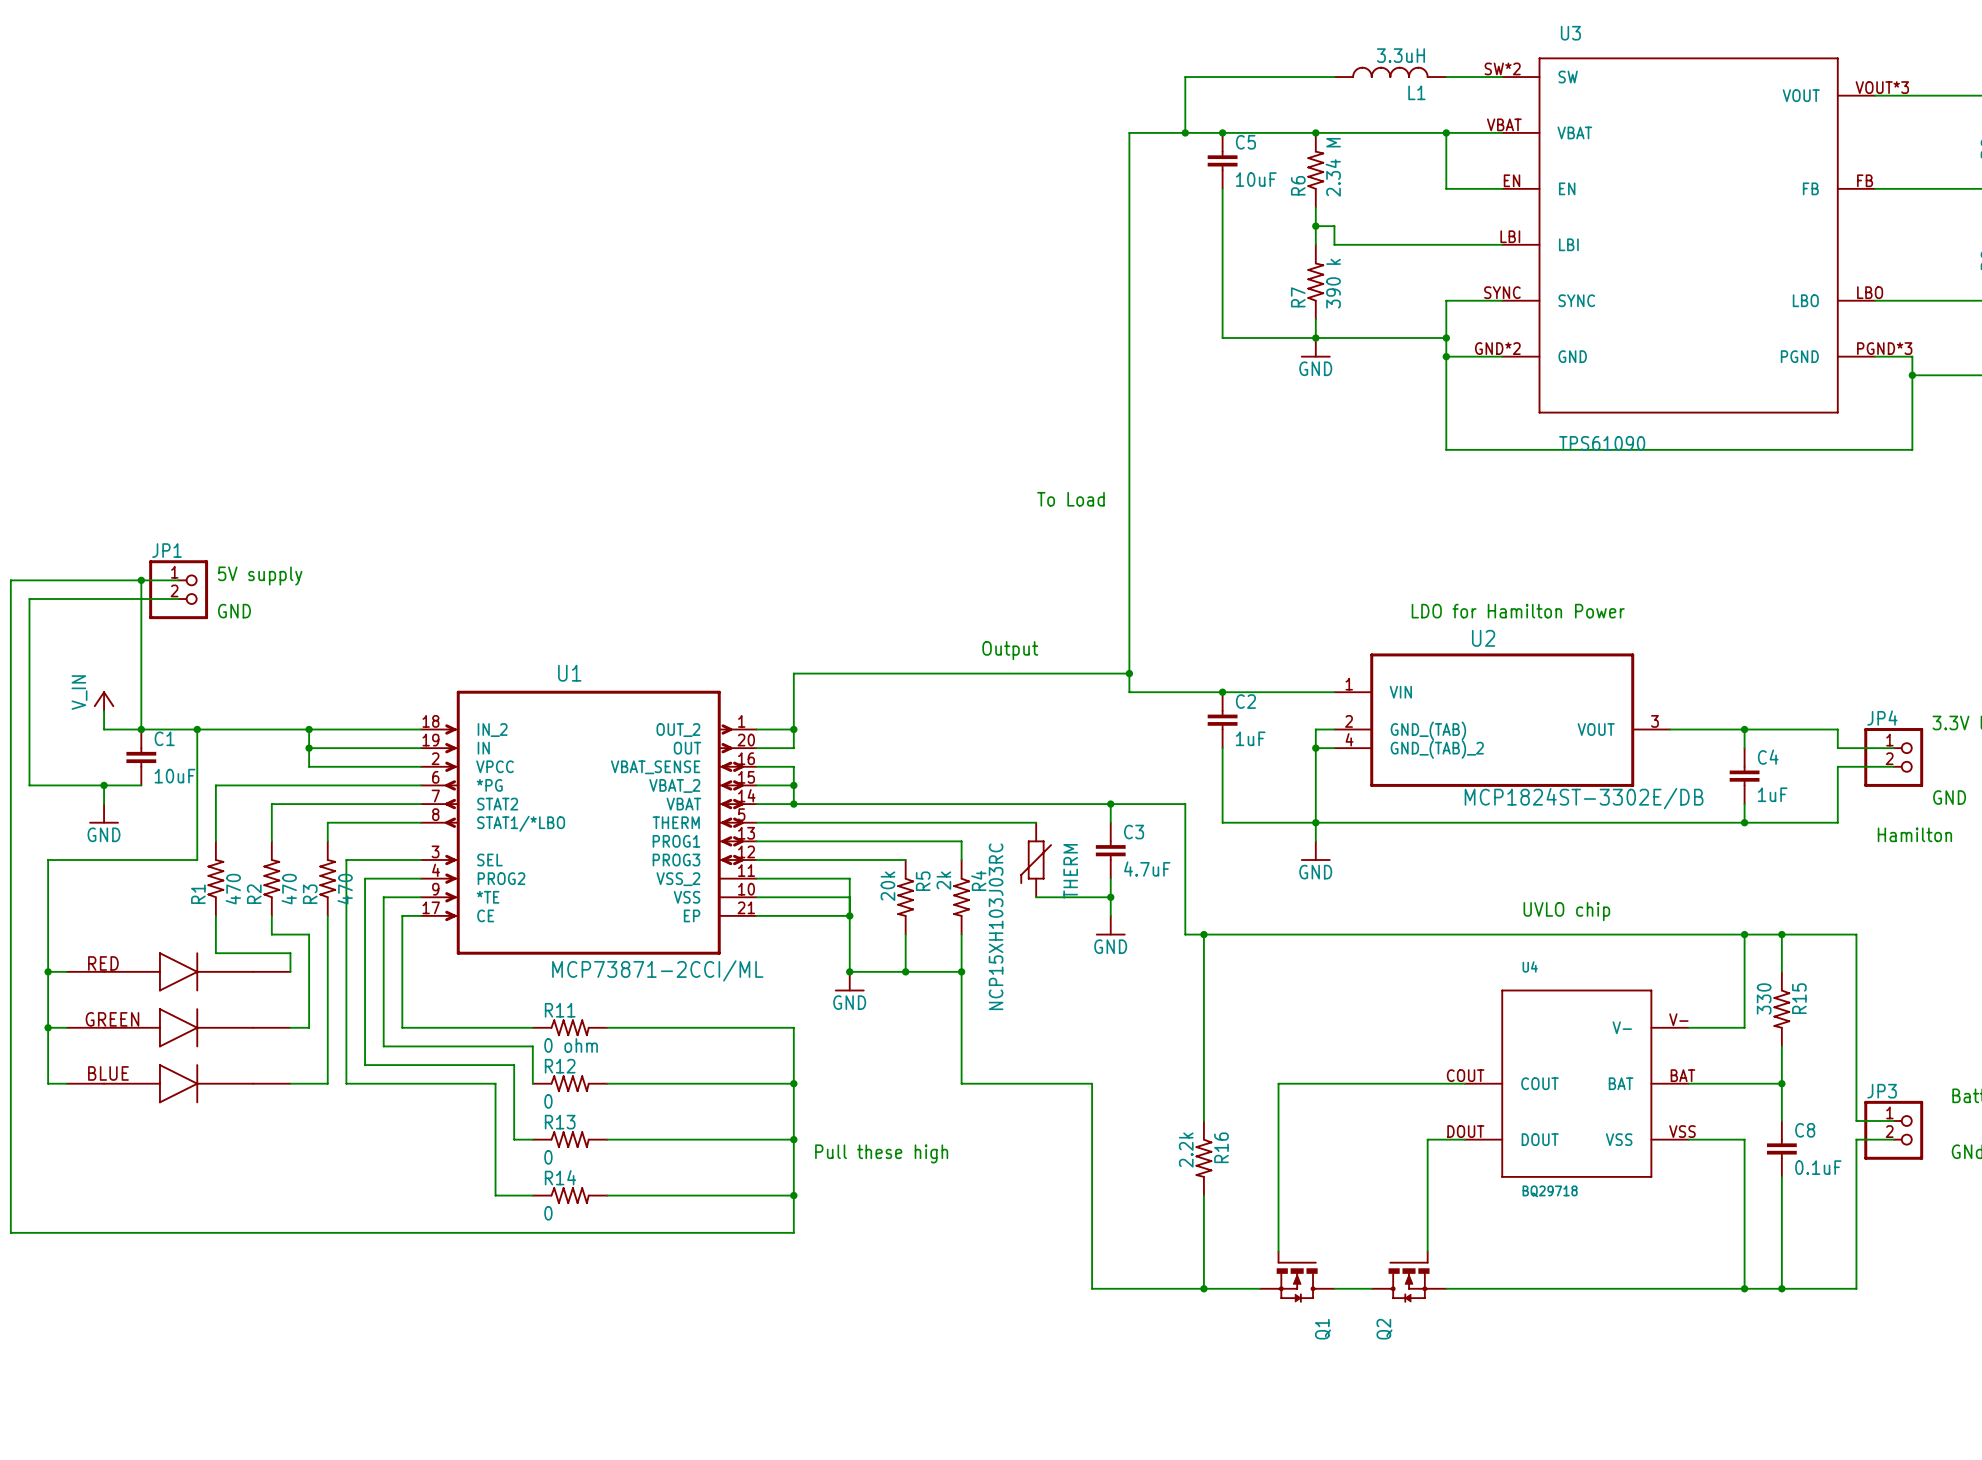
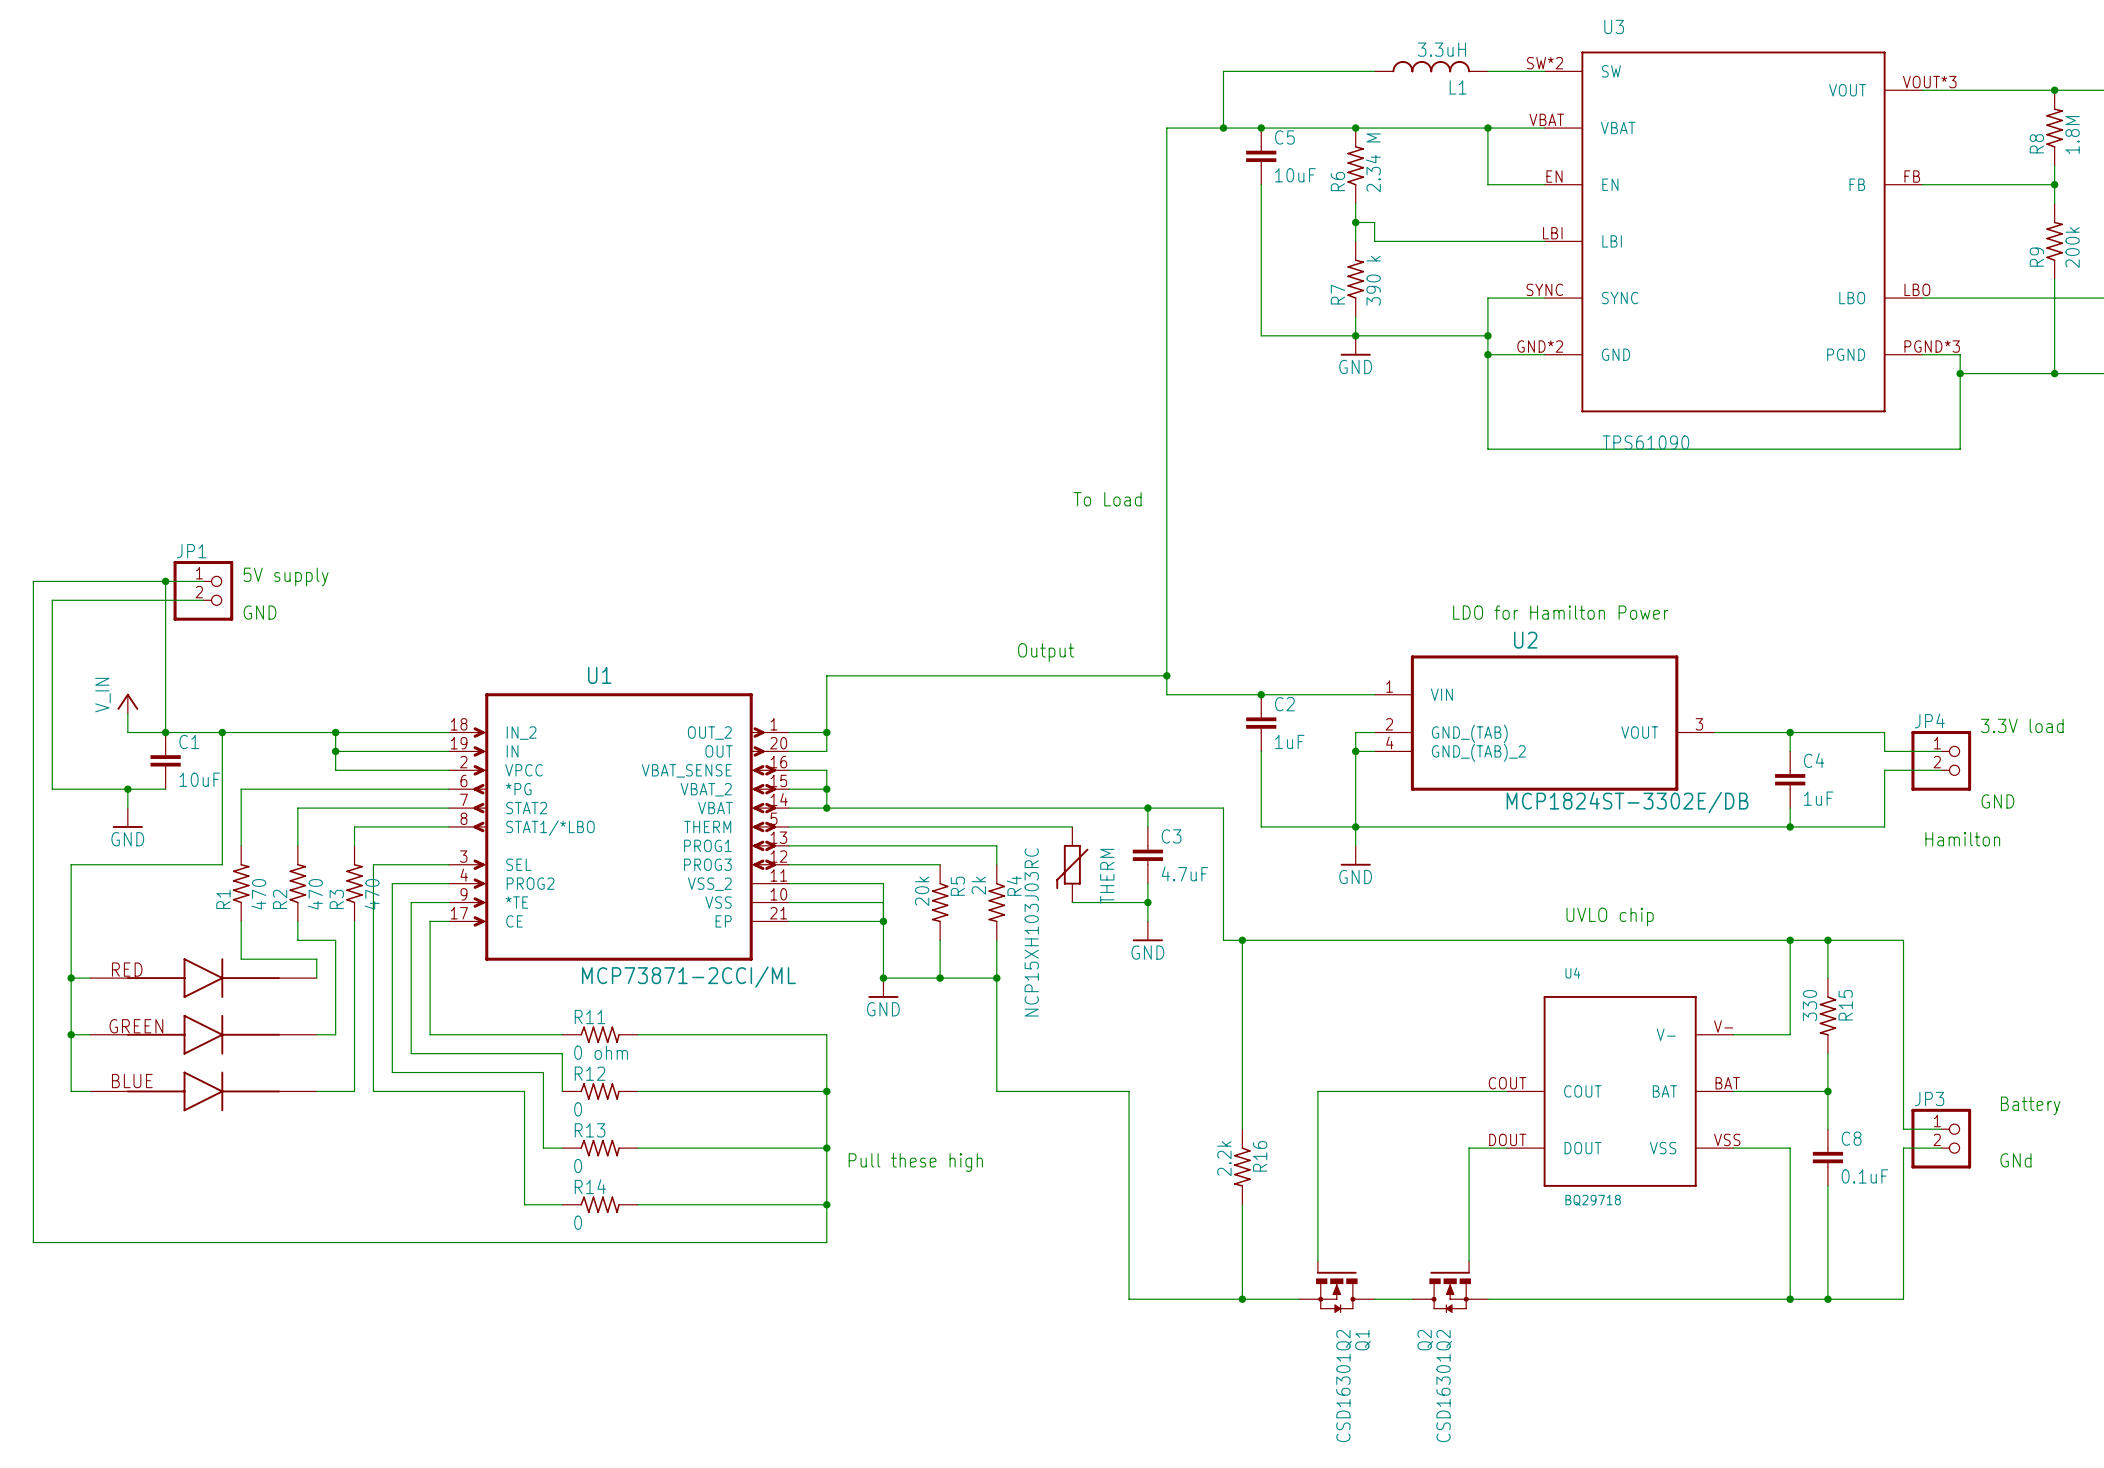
Q1 value: none -> CSD16301Q2 (1344, 1386)
Q2 value: none -> CSD16301Q2 (1444, 1386)

